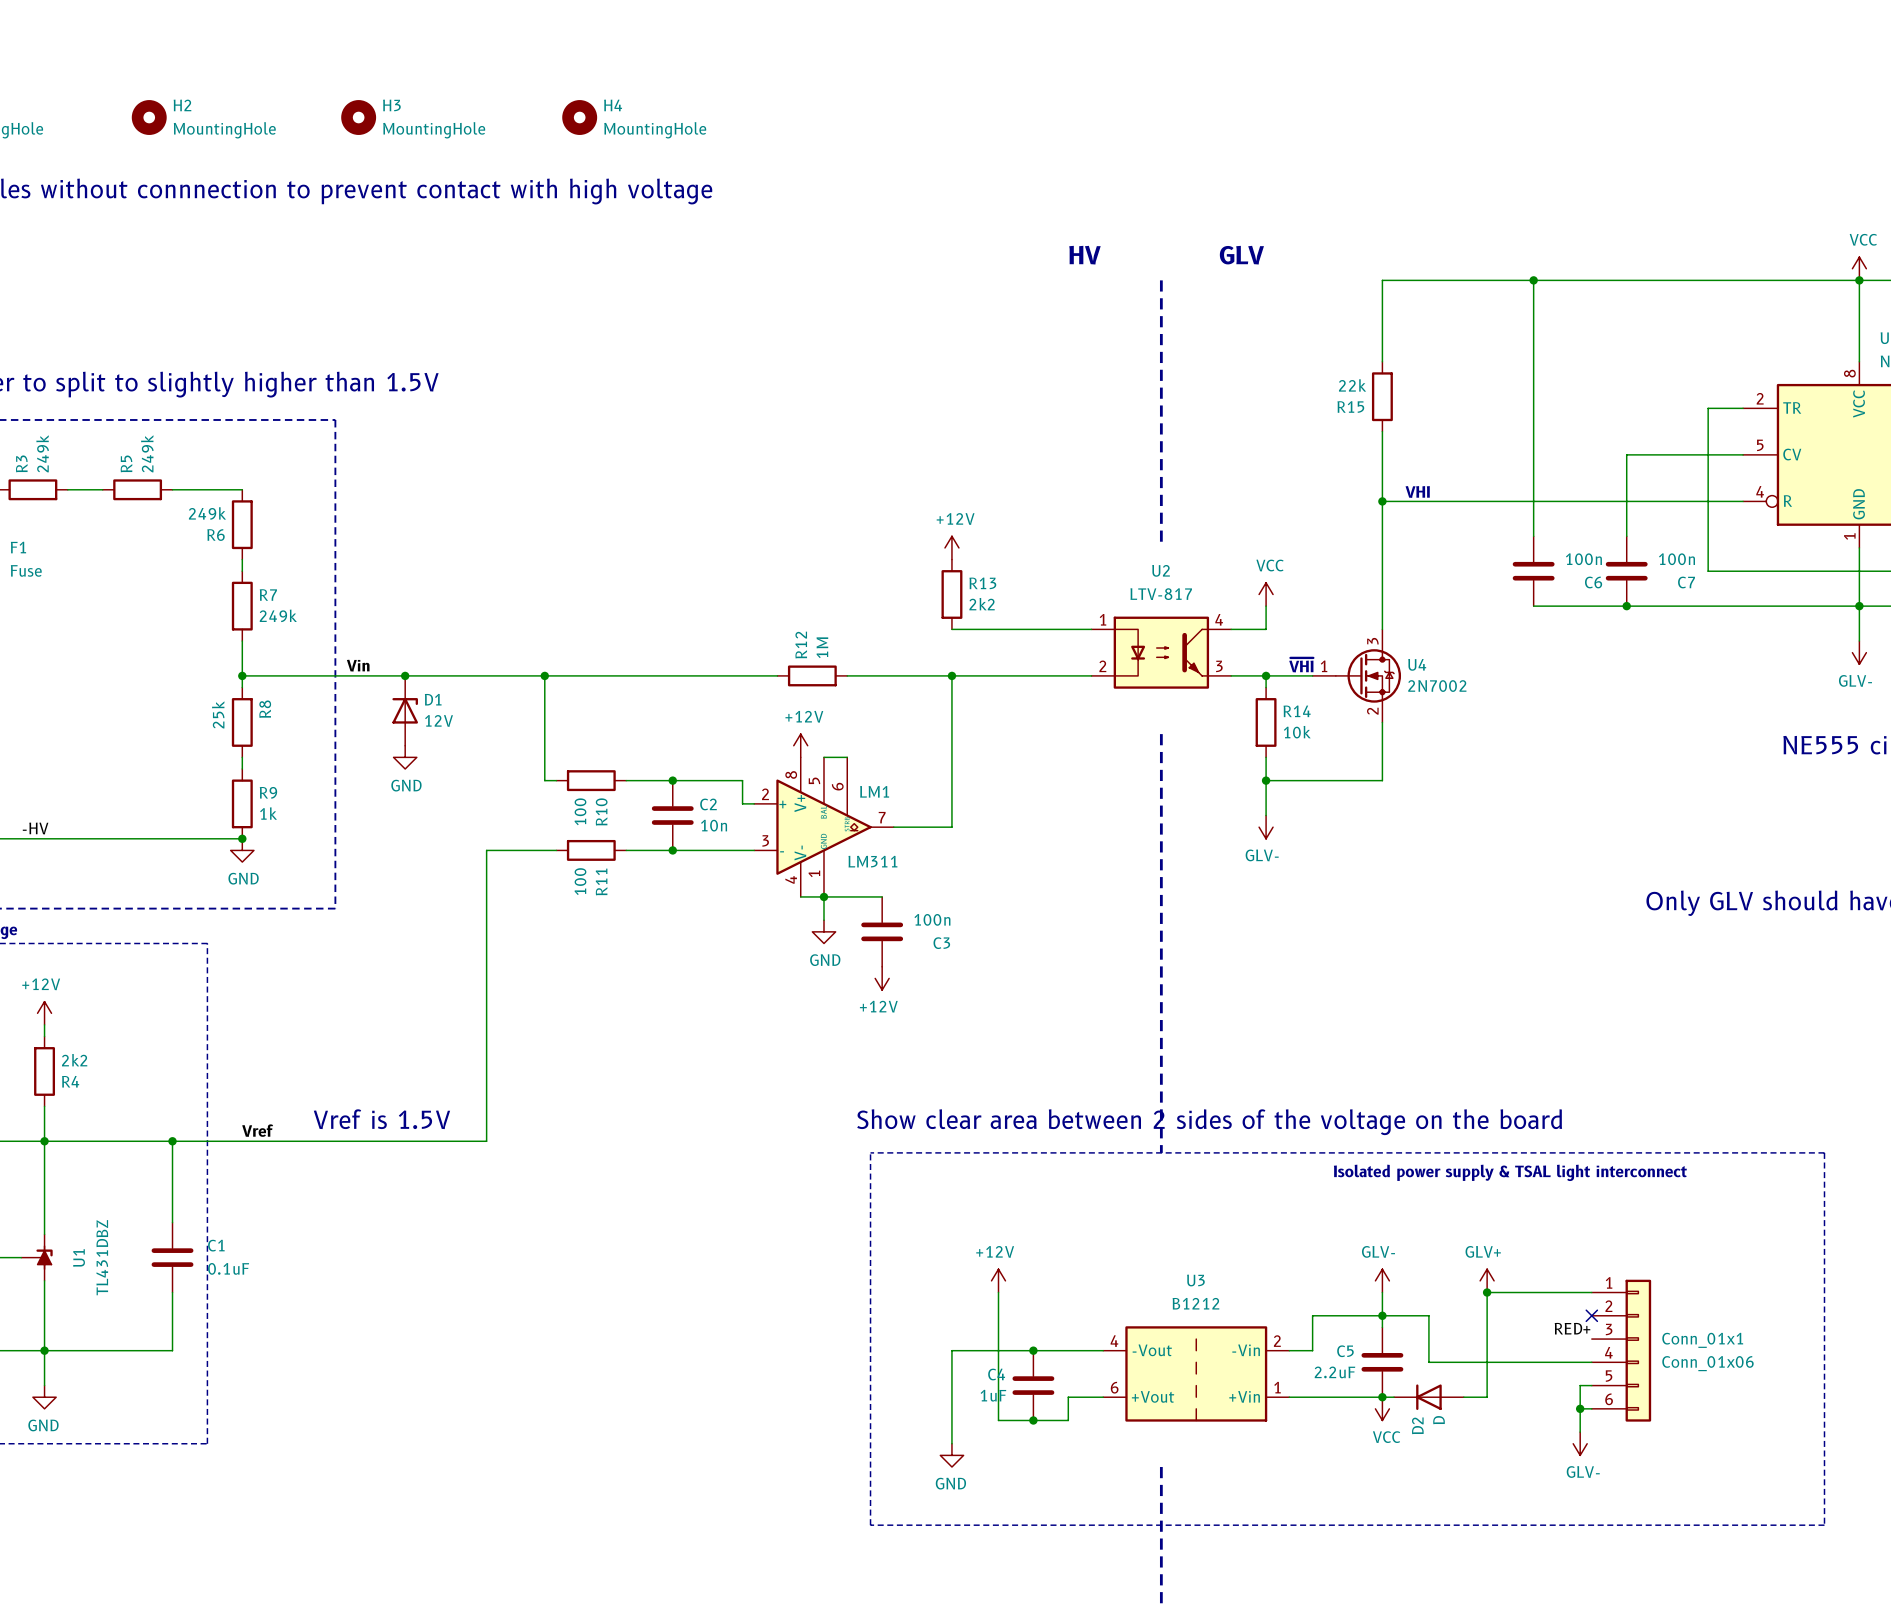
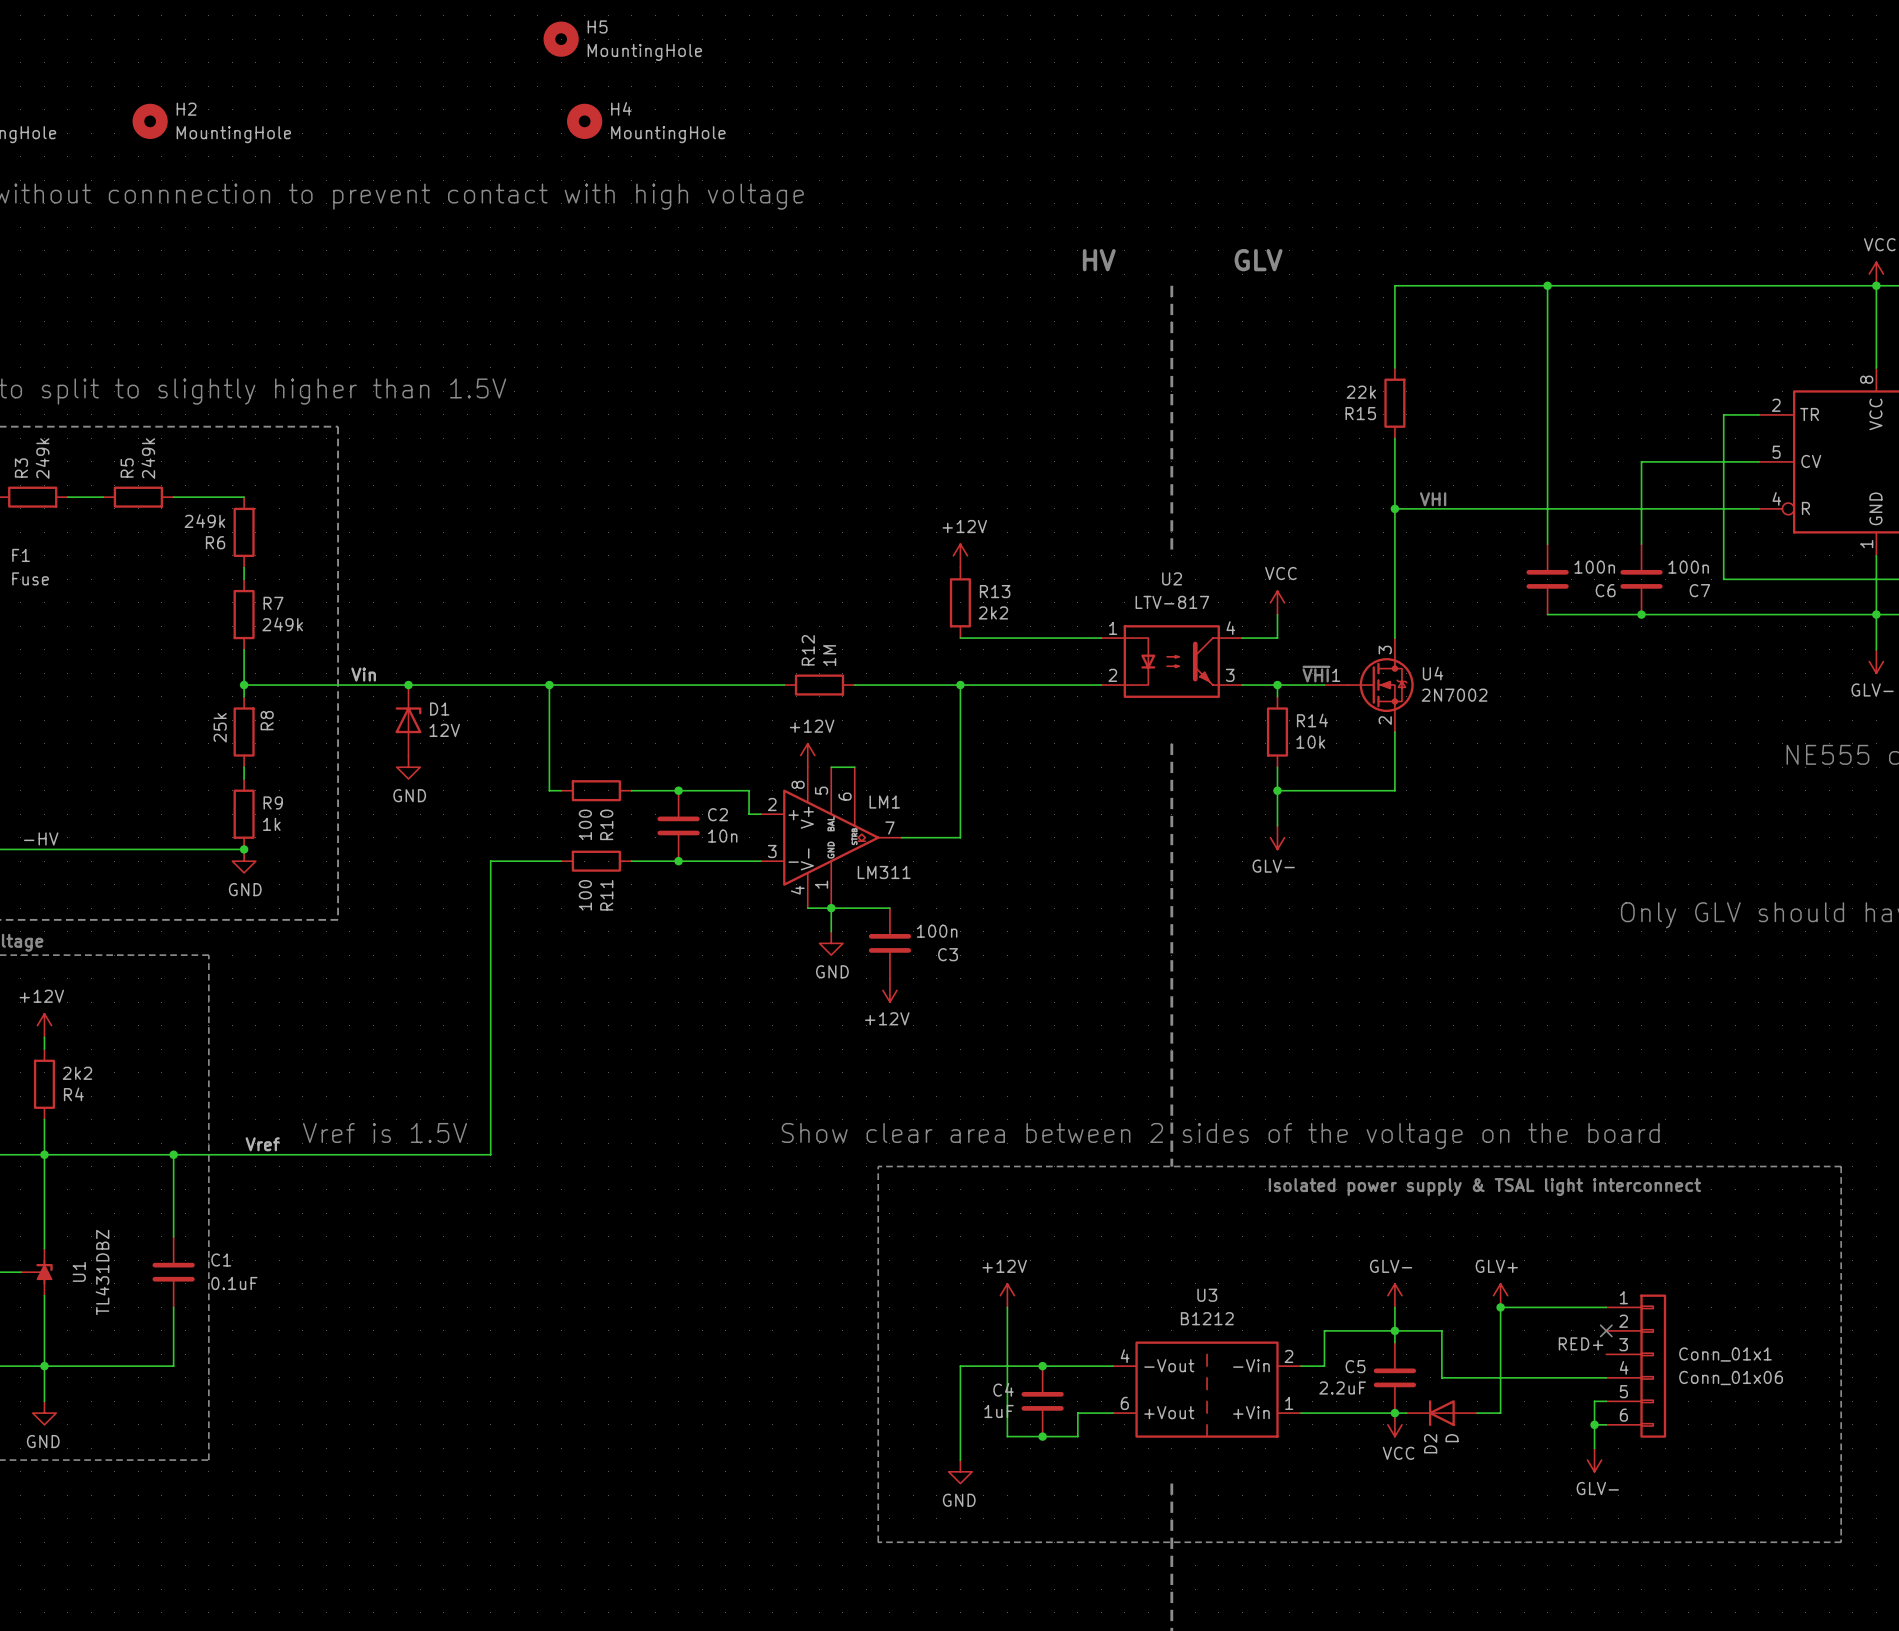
H5: none -> MountingHole (561, 39)
H3: MountingHole (358, 117) -> none

